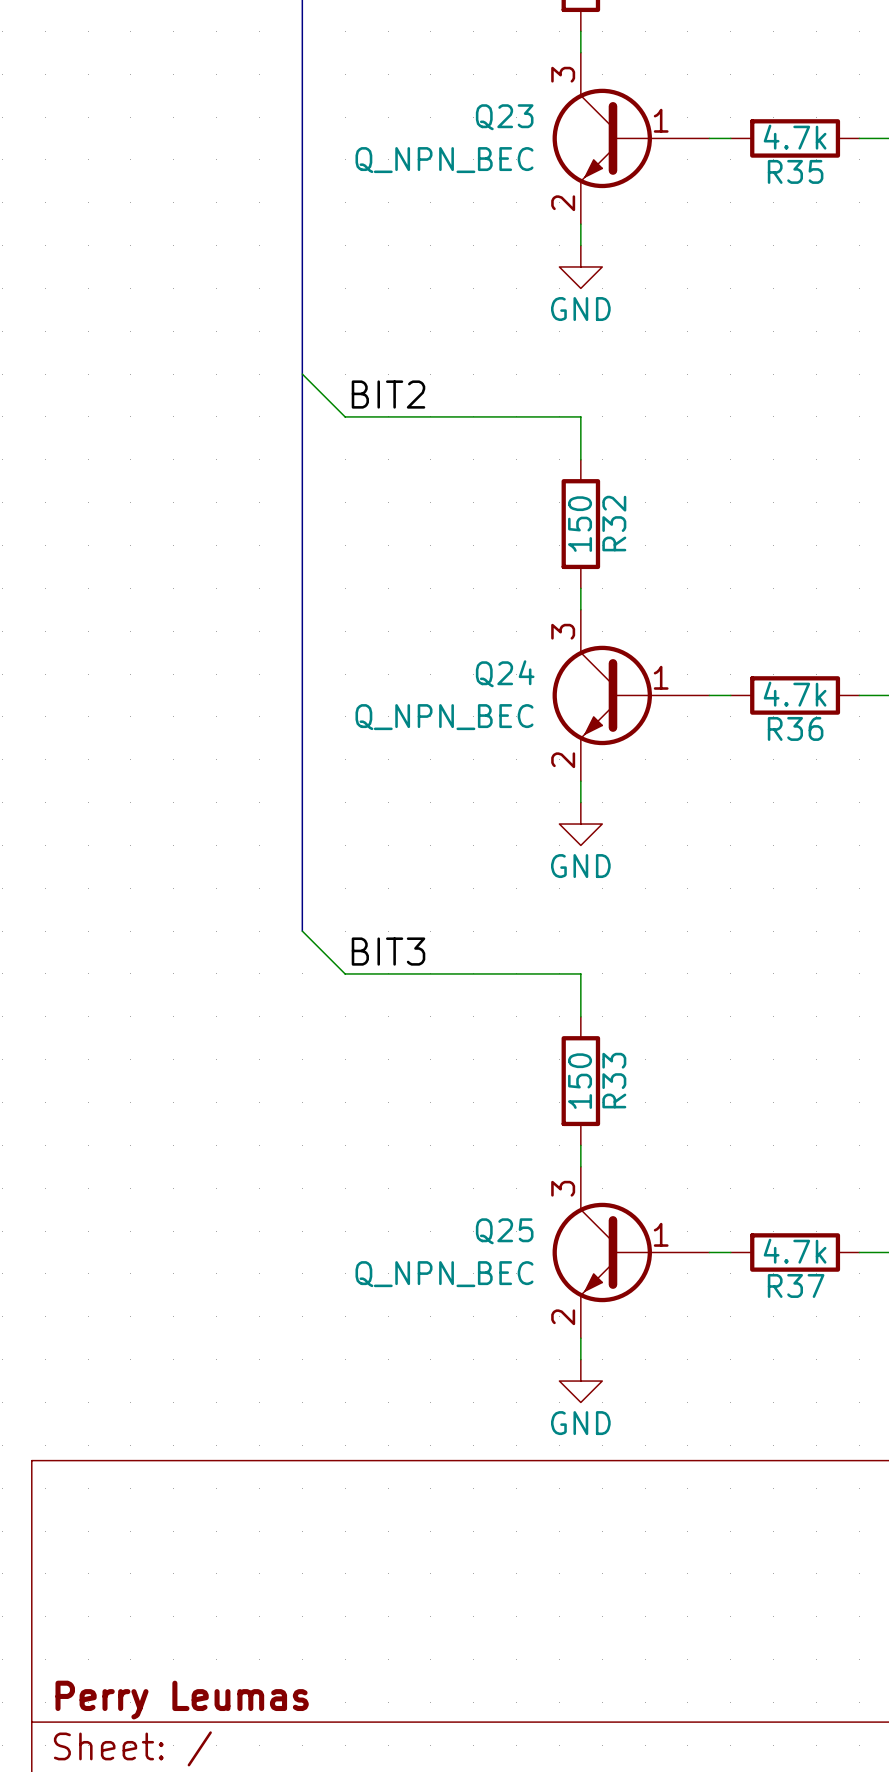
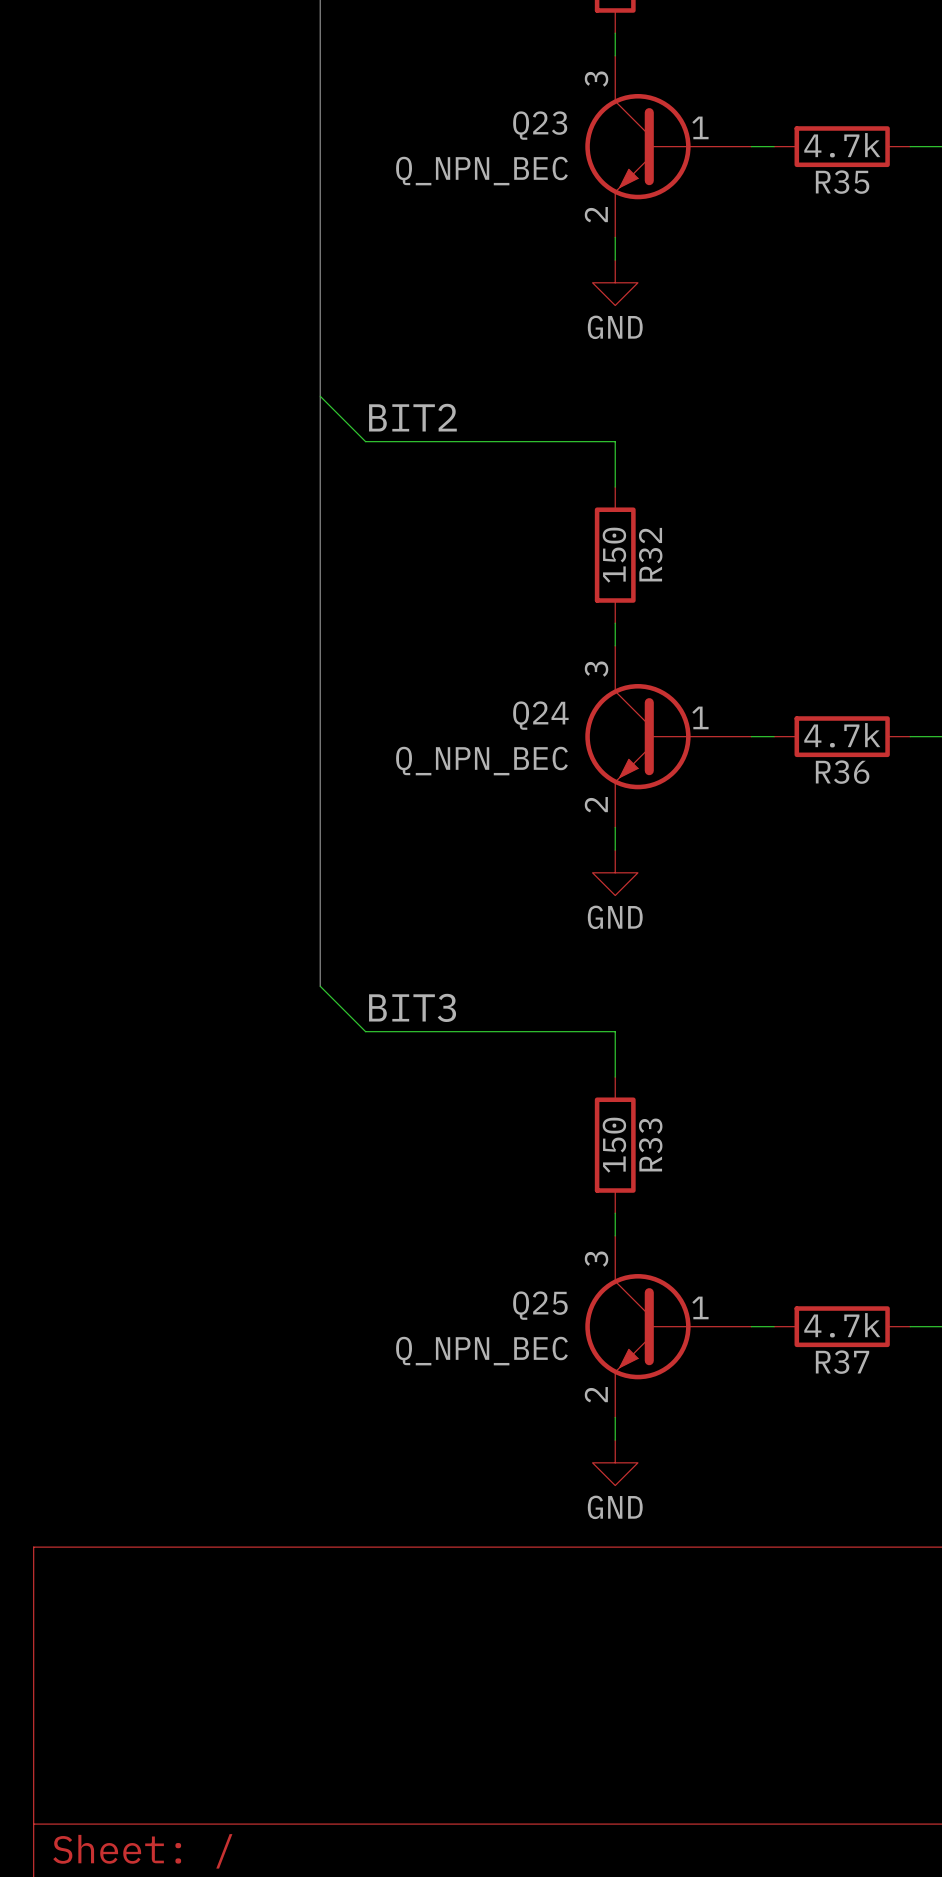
title block: Perry Leumas (182, 1700) -> none

